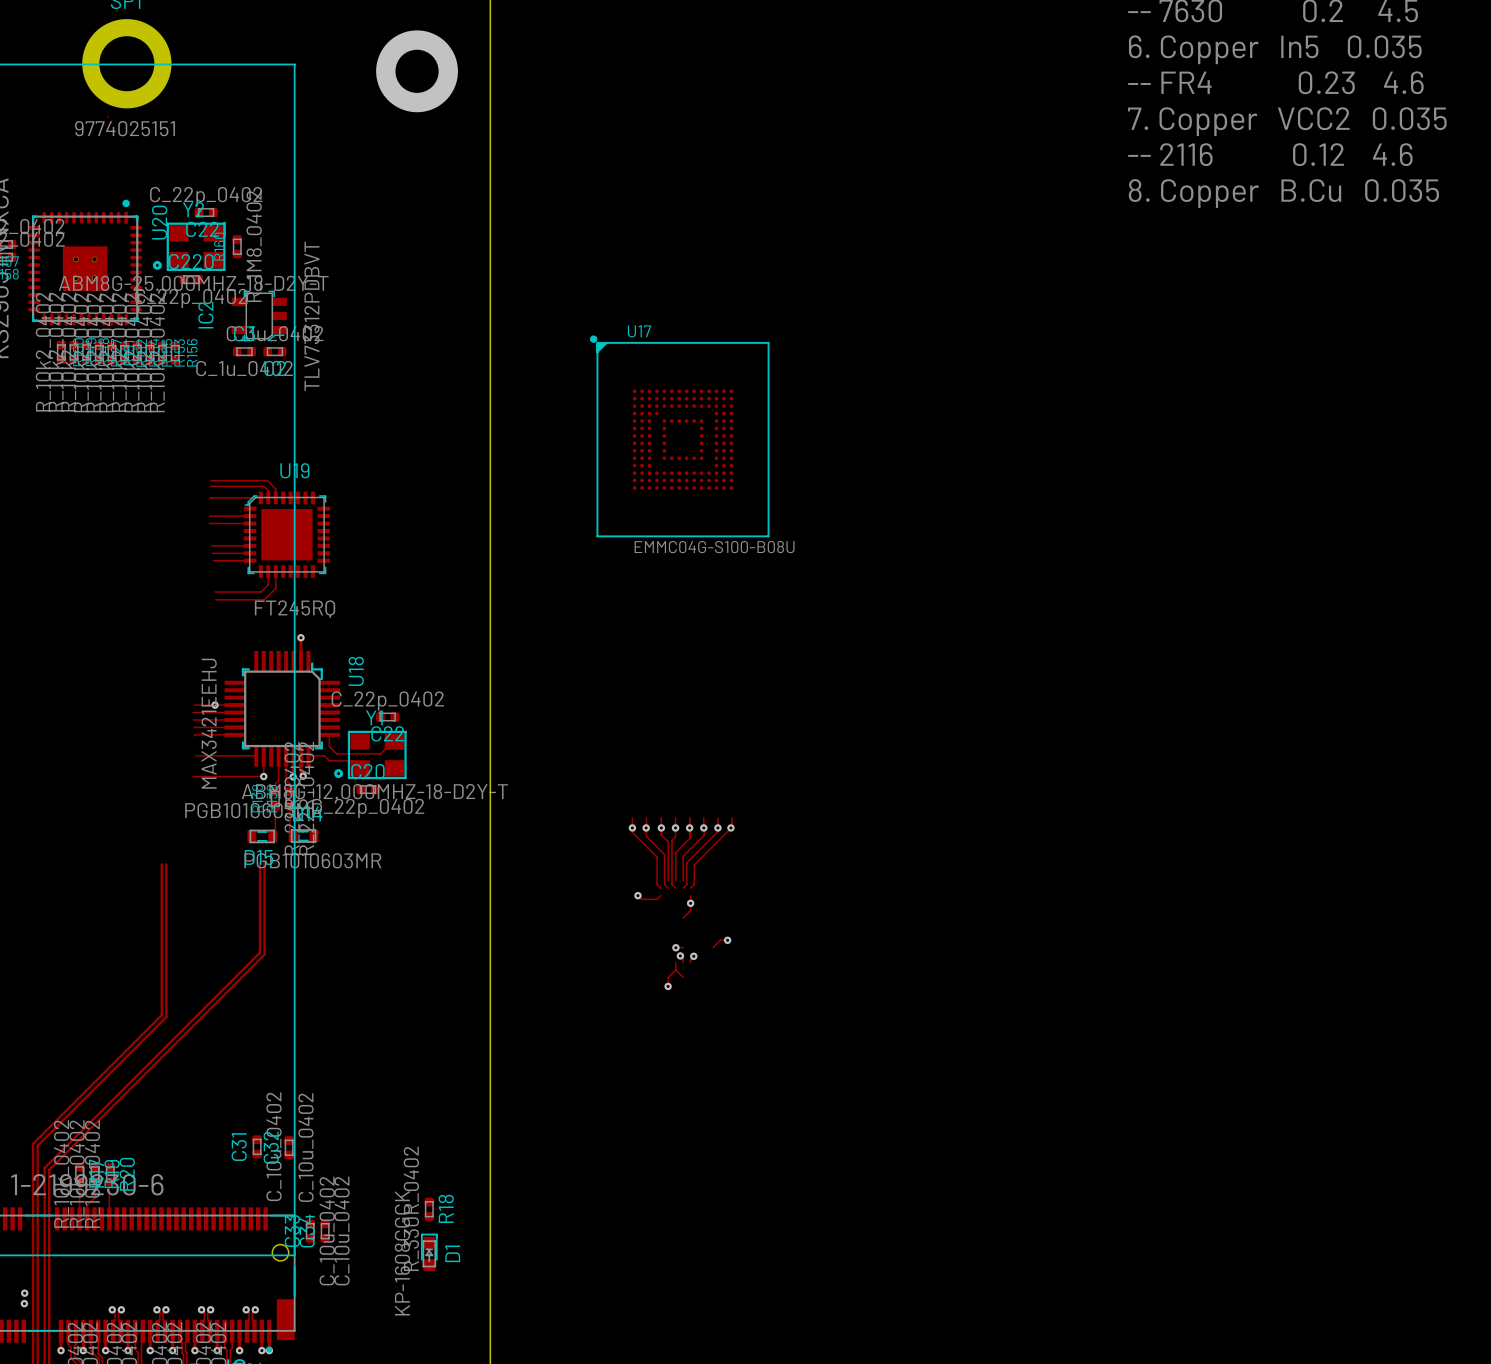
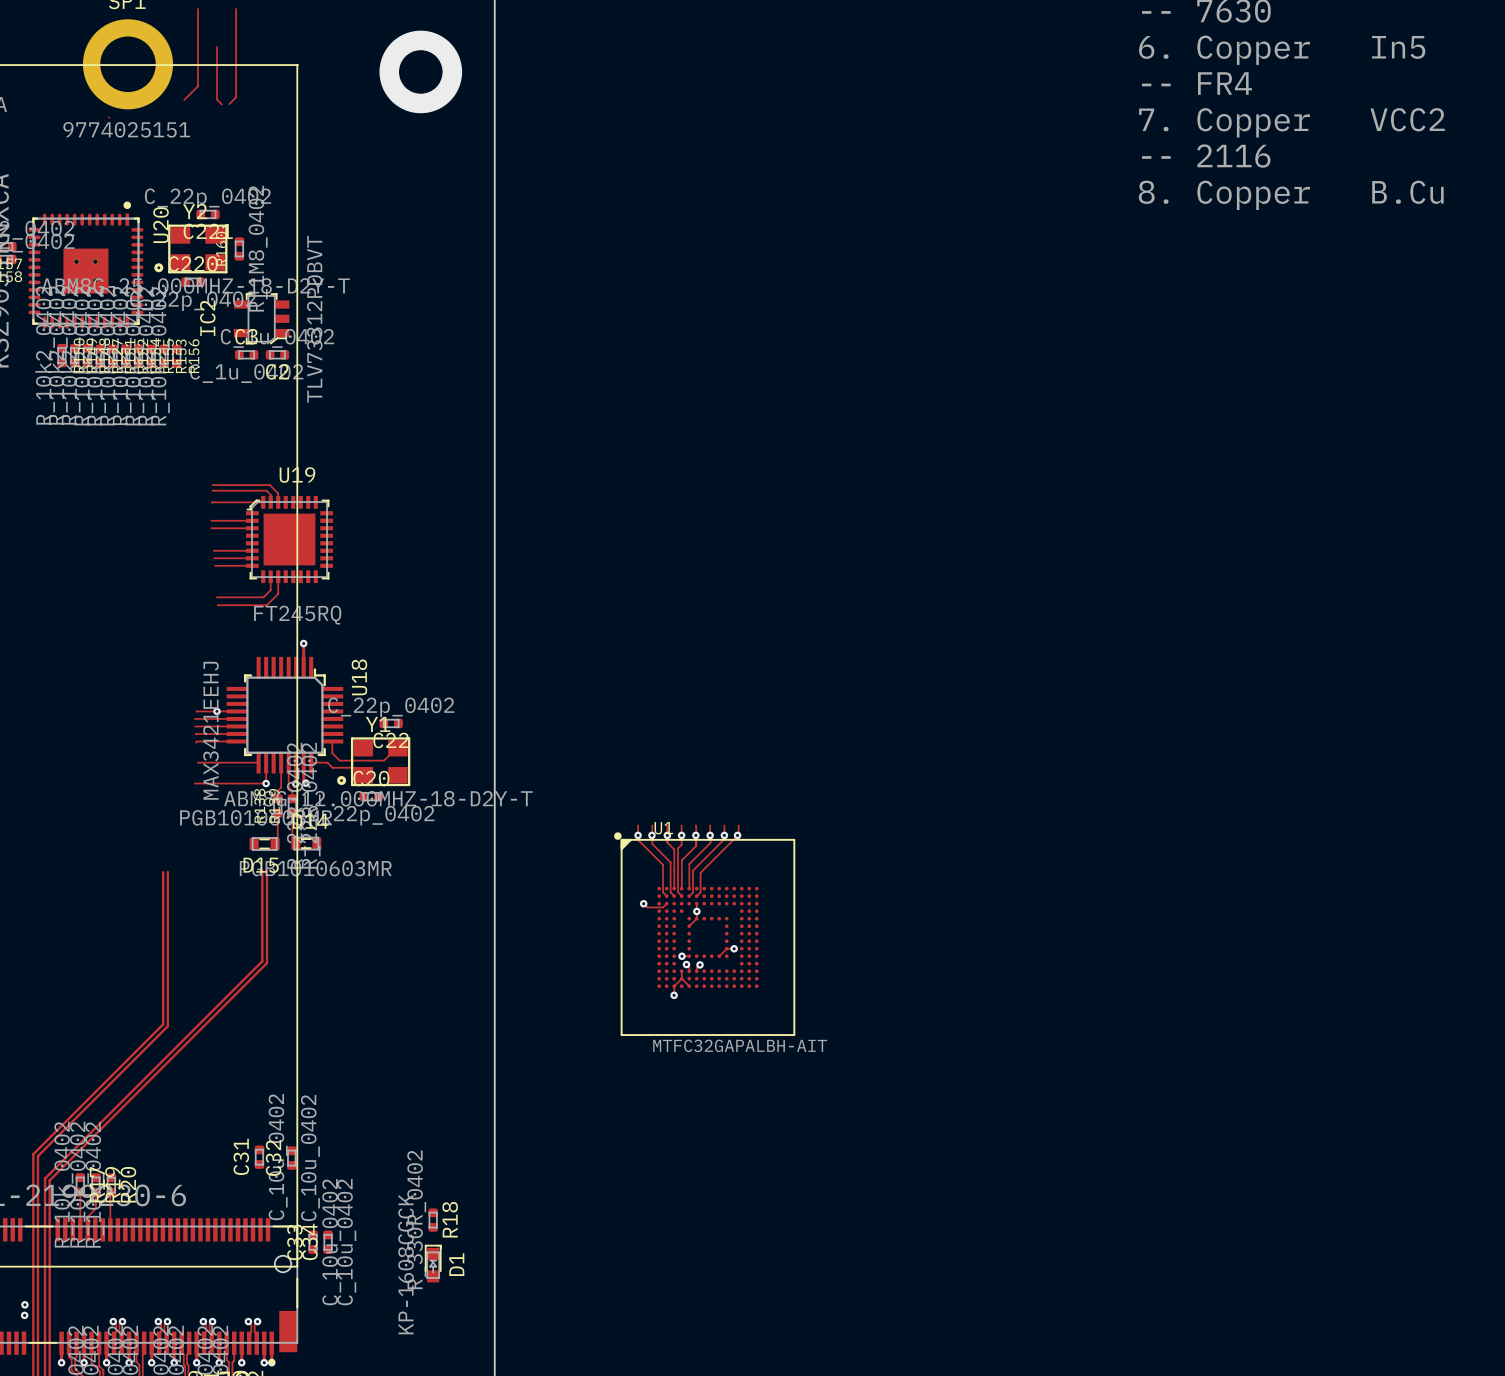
track: none -> (197, 8) (197, 86) (184, 99)
track: none -> (236, 8) (236, 97) (229, 104)
track: none -> (217, 47) (217, 99) (221, 104)
U17: EMMC04G-S100-B08U (679, 436) -> none
U1: none -> MTFC32GAPALBH-AIT (704, 934)

